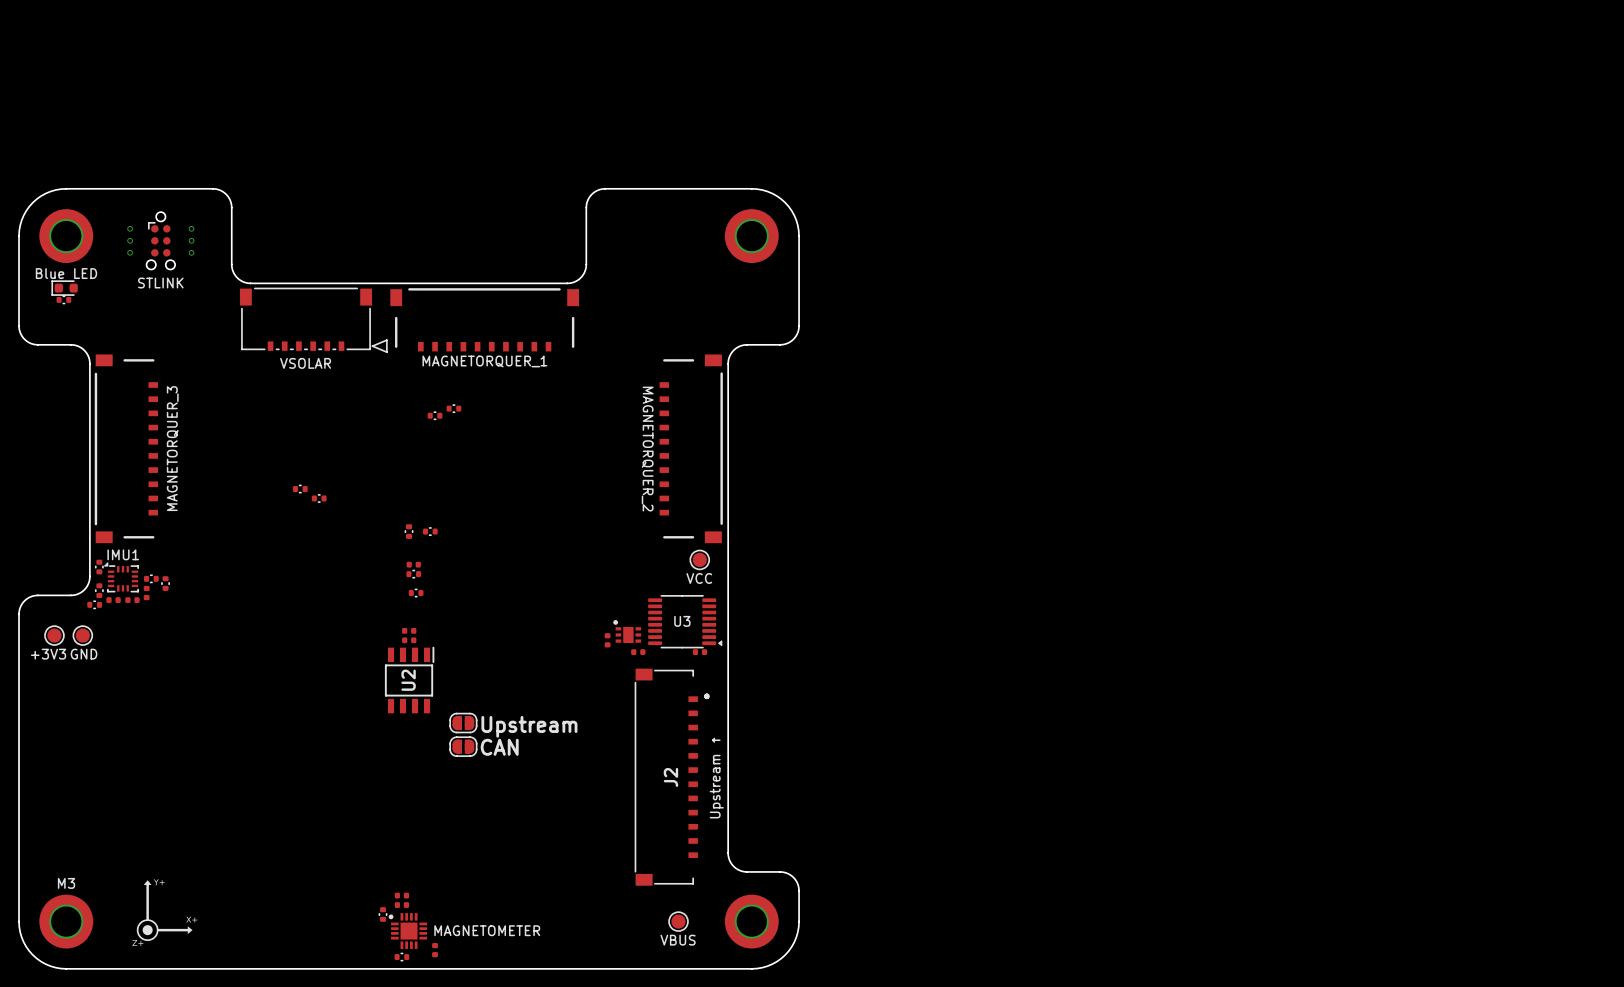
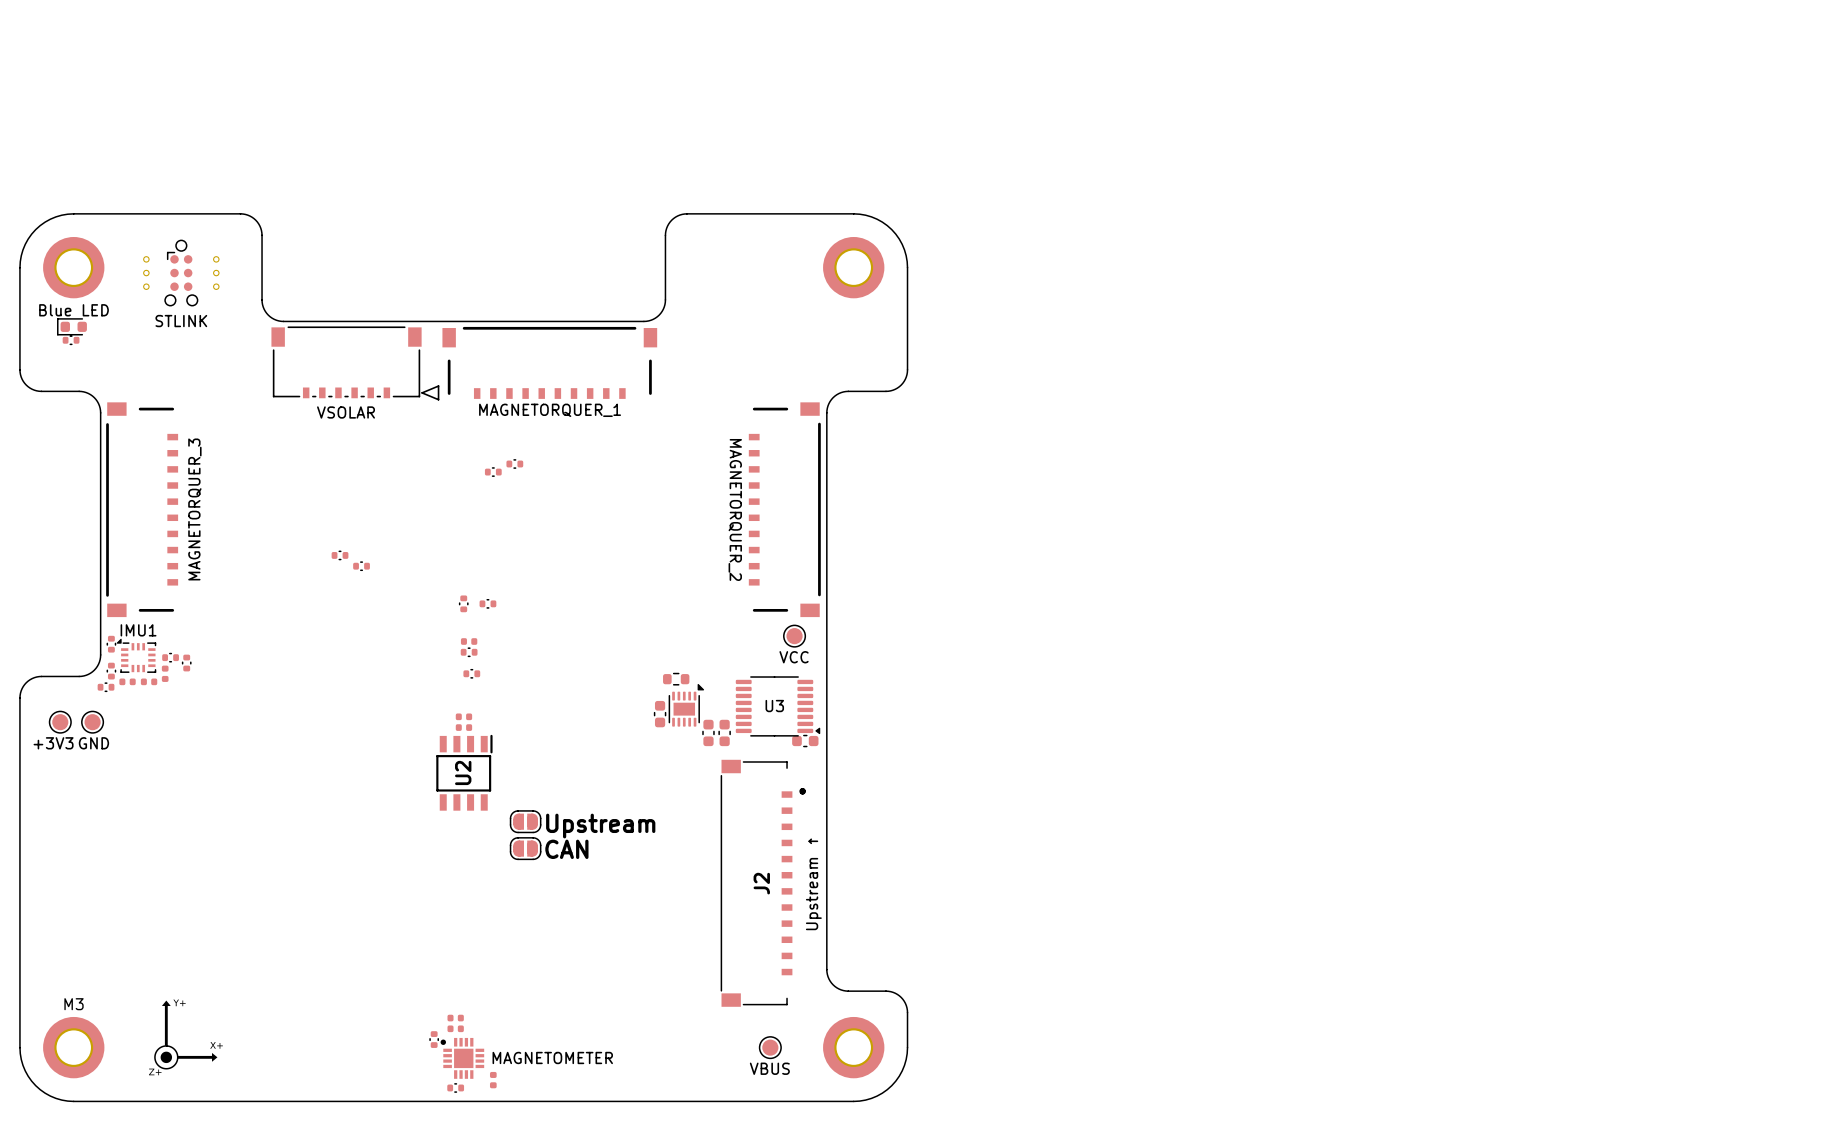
part: none -> (676, 679)
part: none -> (686, 705)
part: none -> (660, 714)
part: (627, 631) -> none
part: (607, 640) -> none
part: none -> (708, 732)
part footprint: [631, 649, 646, 656] -> [718, 719, 731, 747]
part footprint: [692, 649, 708, 656] -> [792, 734, 819, 748]

